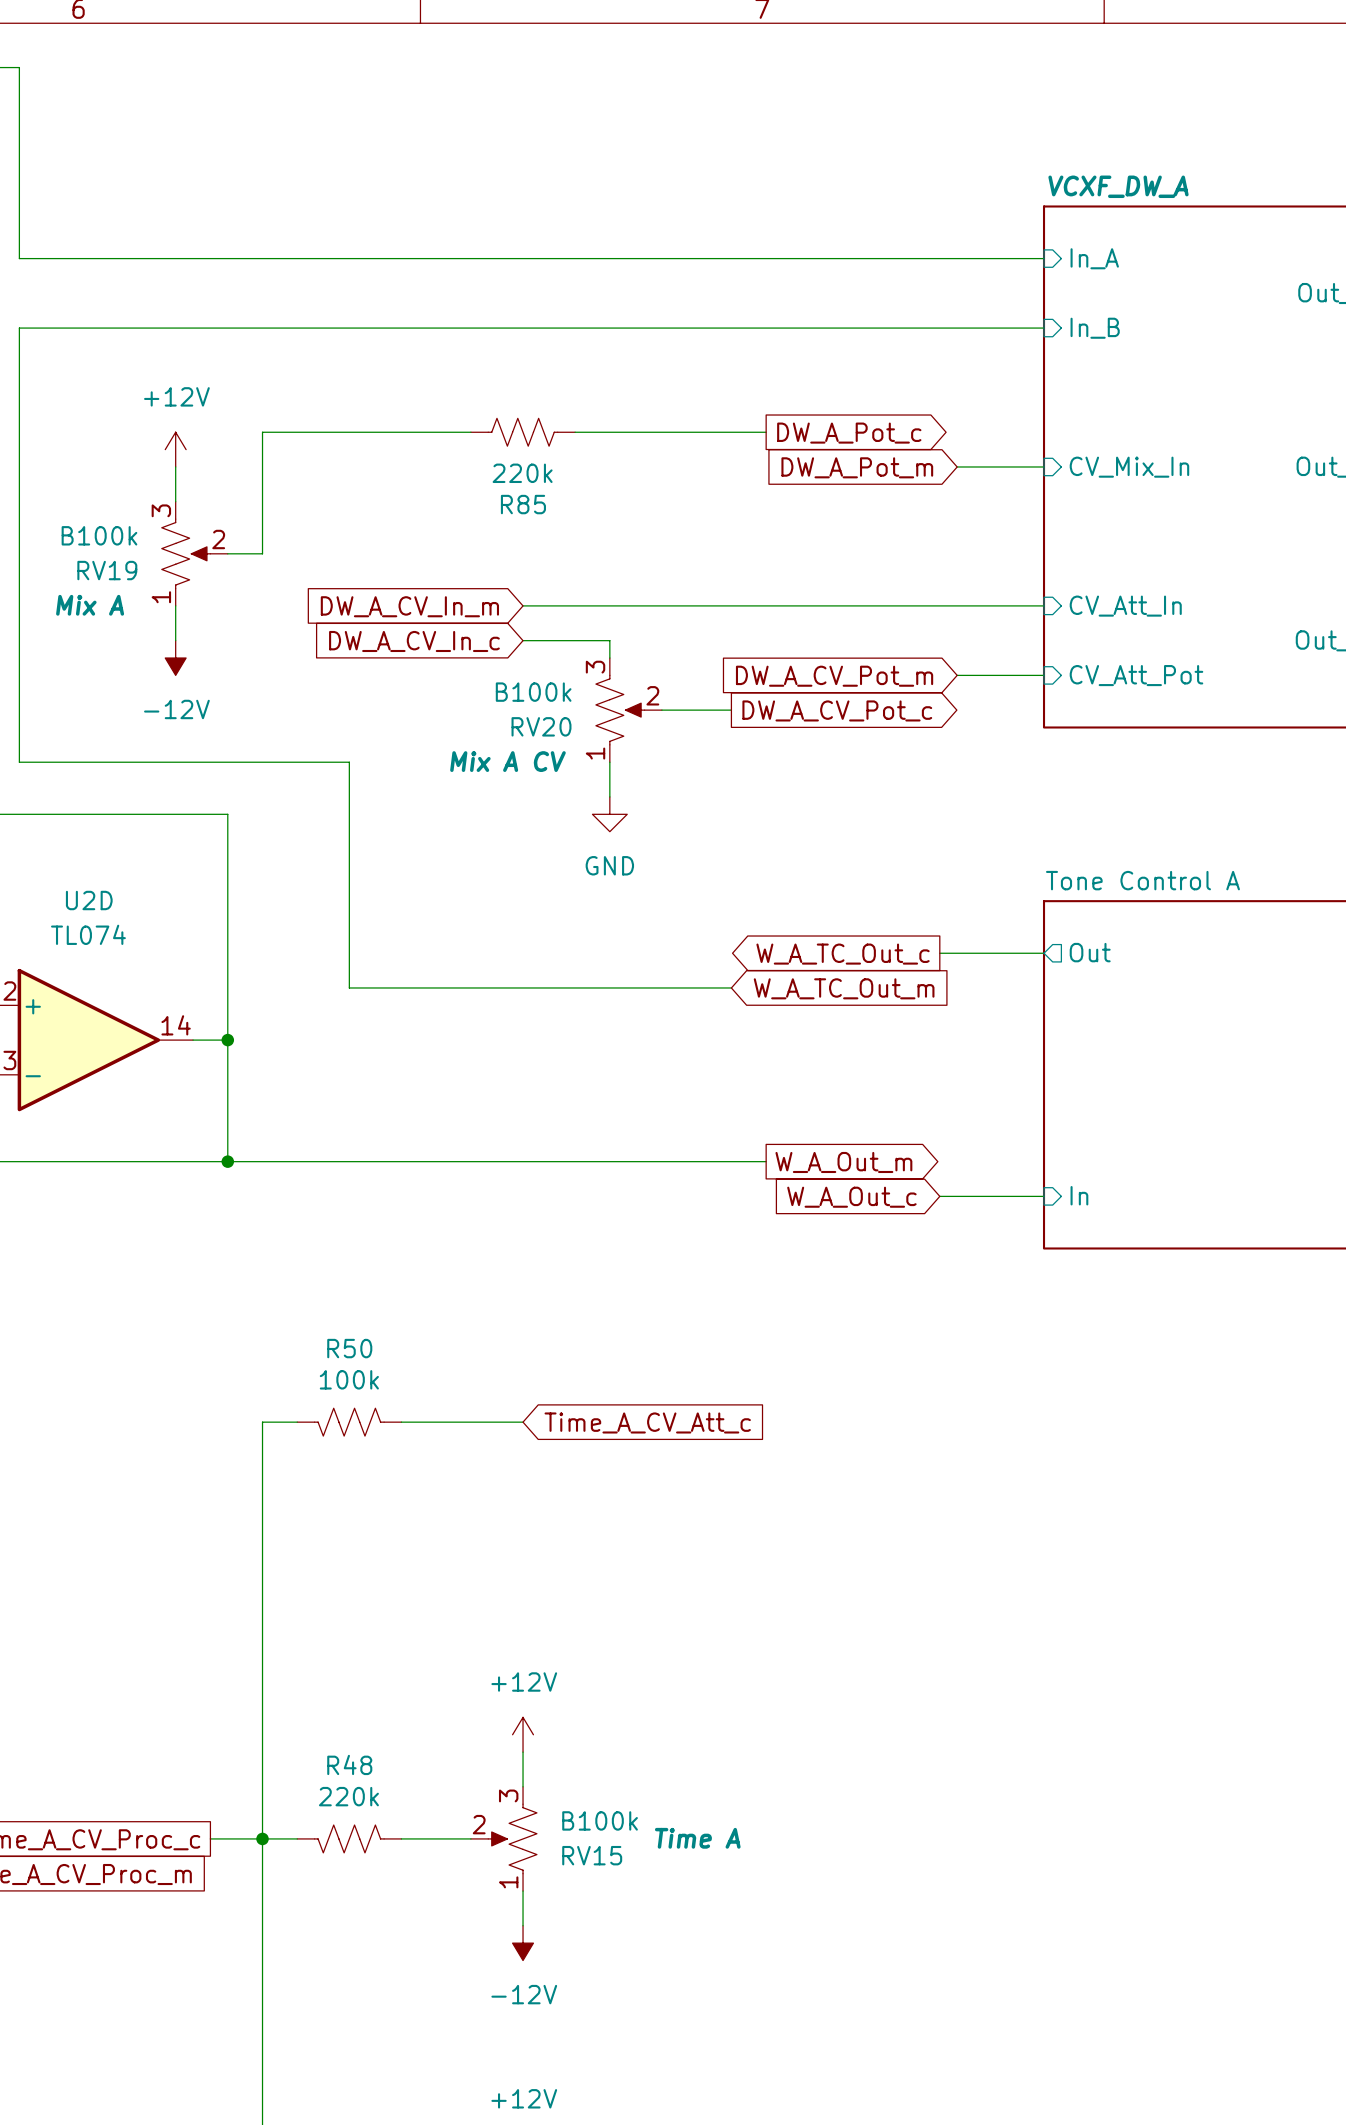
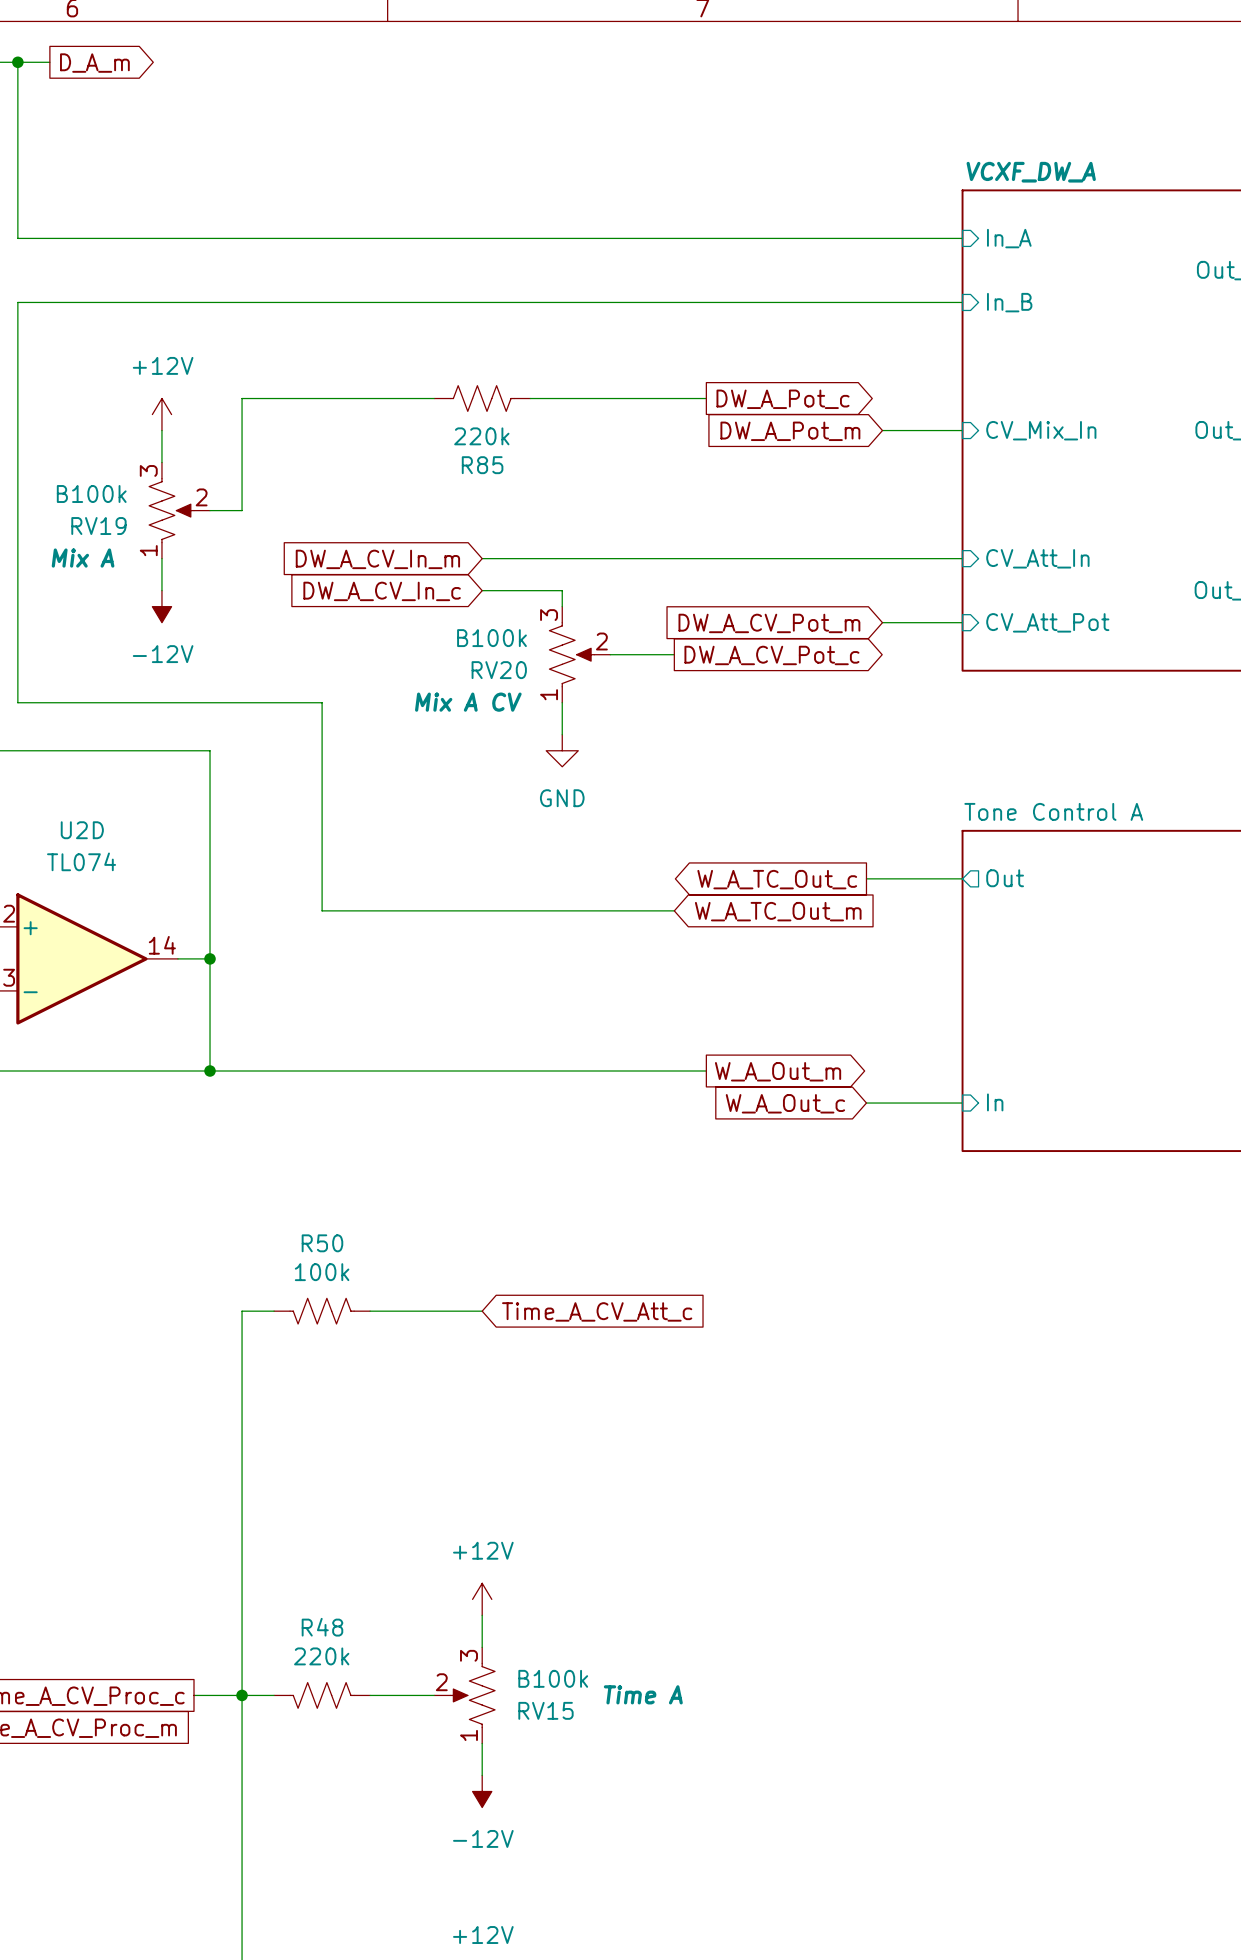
wire: none -> (17, 62) (49, 62)
junction: none -> (17, 62)
global label: none -> D_A_m (94, 63)

